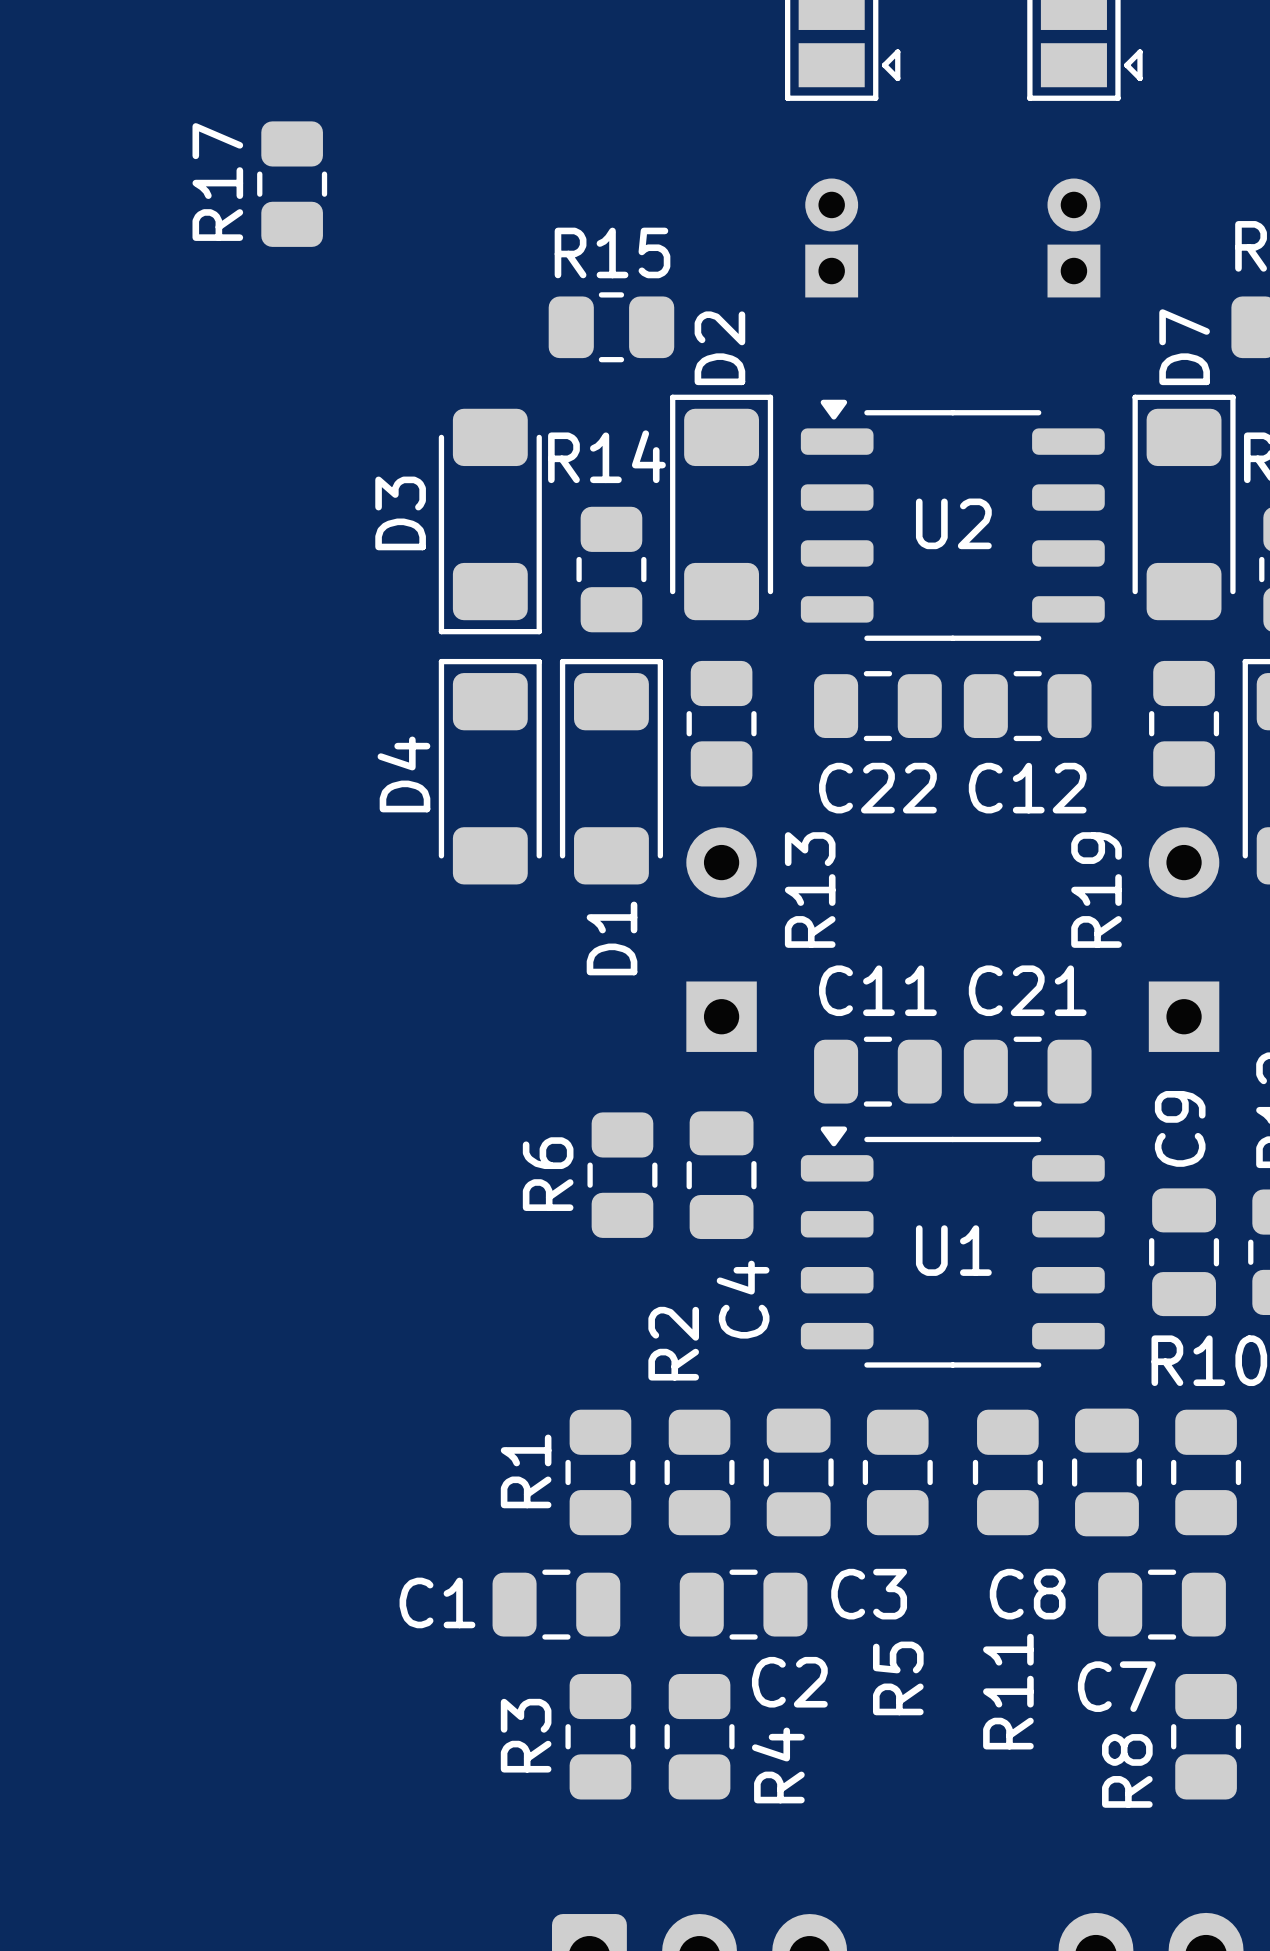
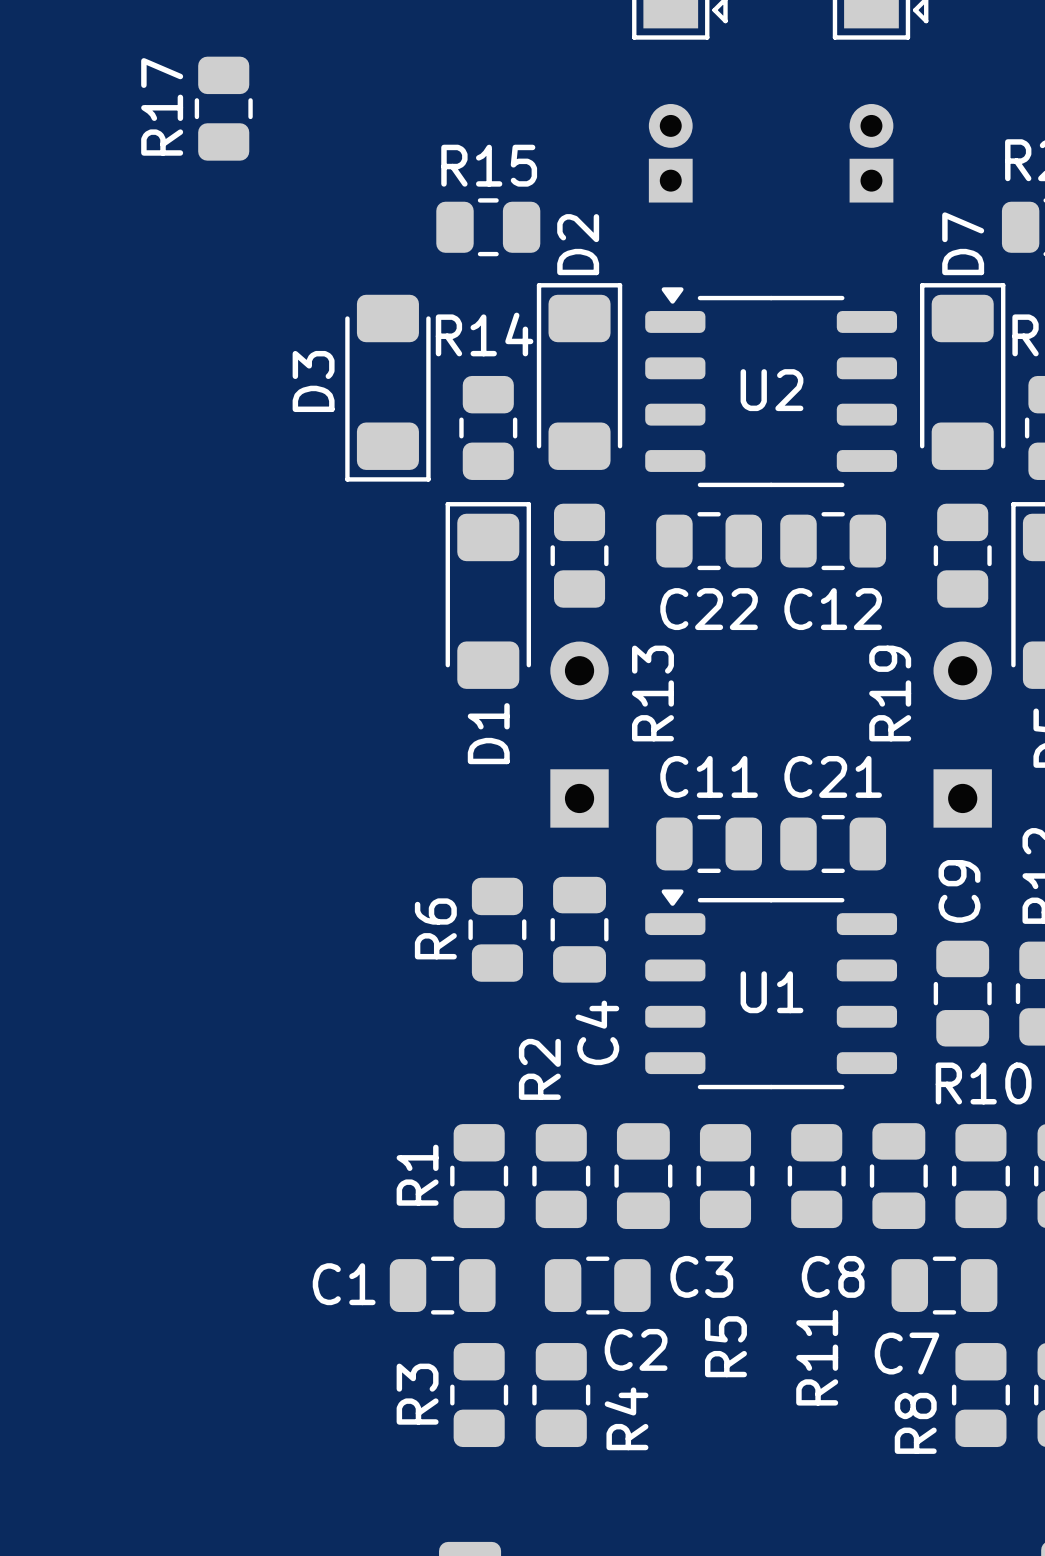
D4: (490, 771) -> none

